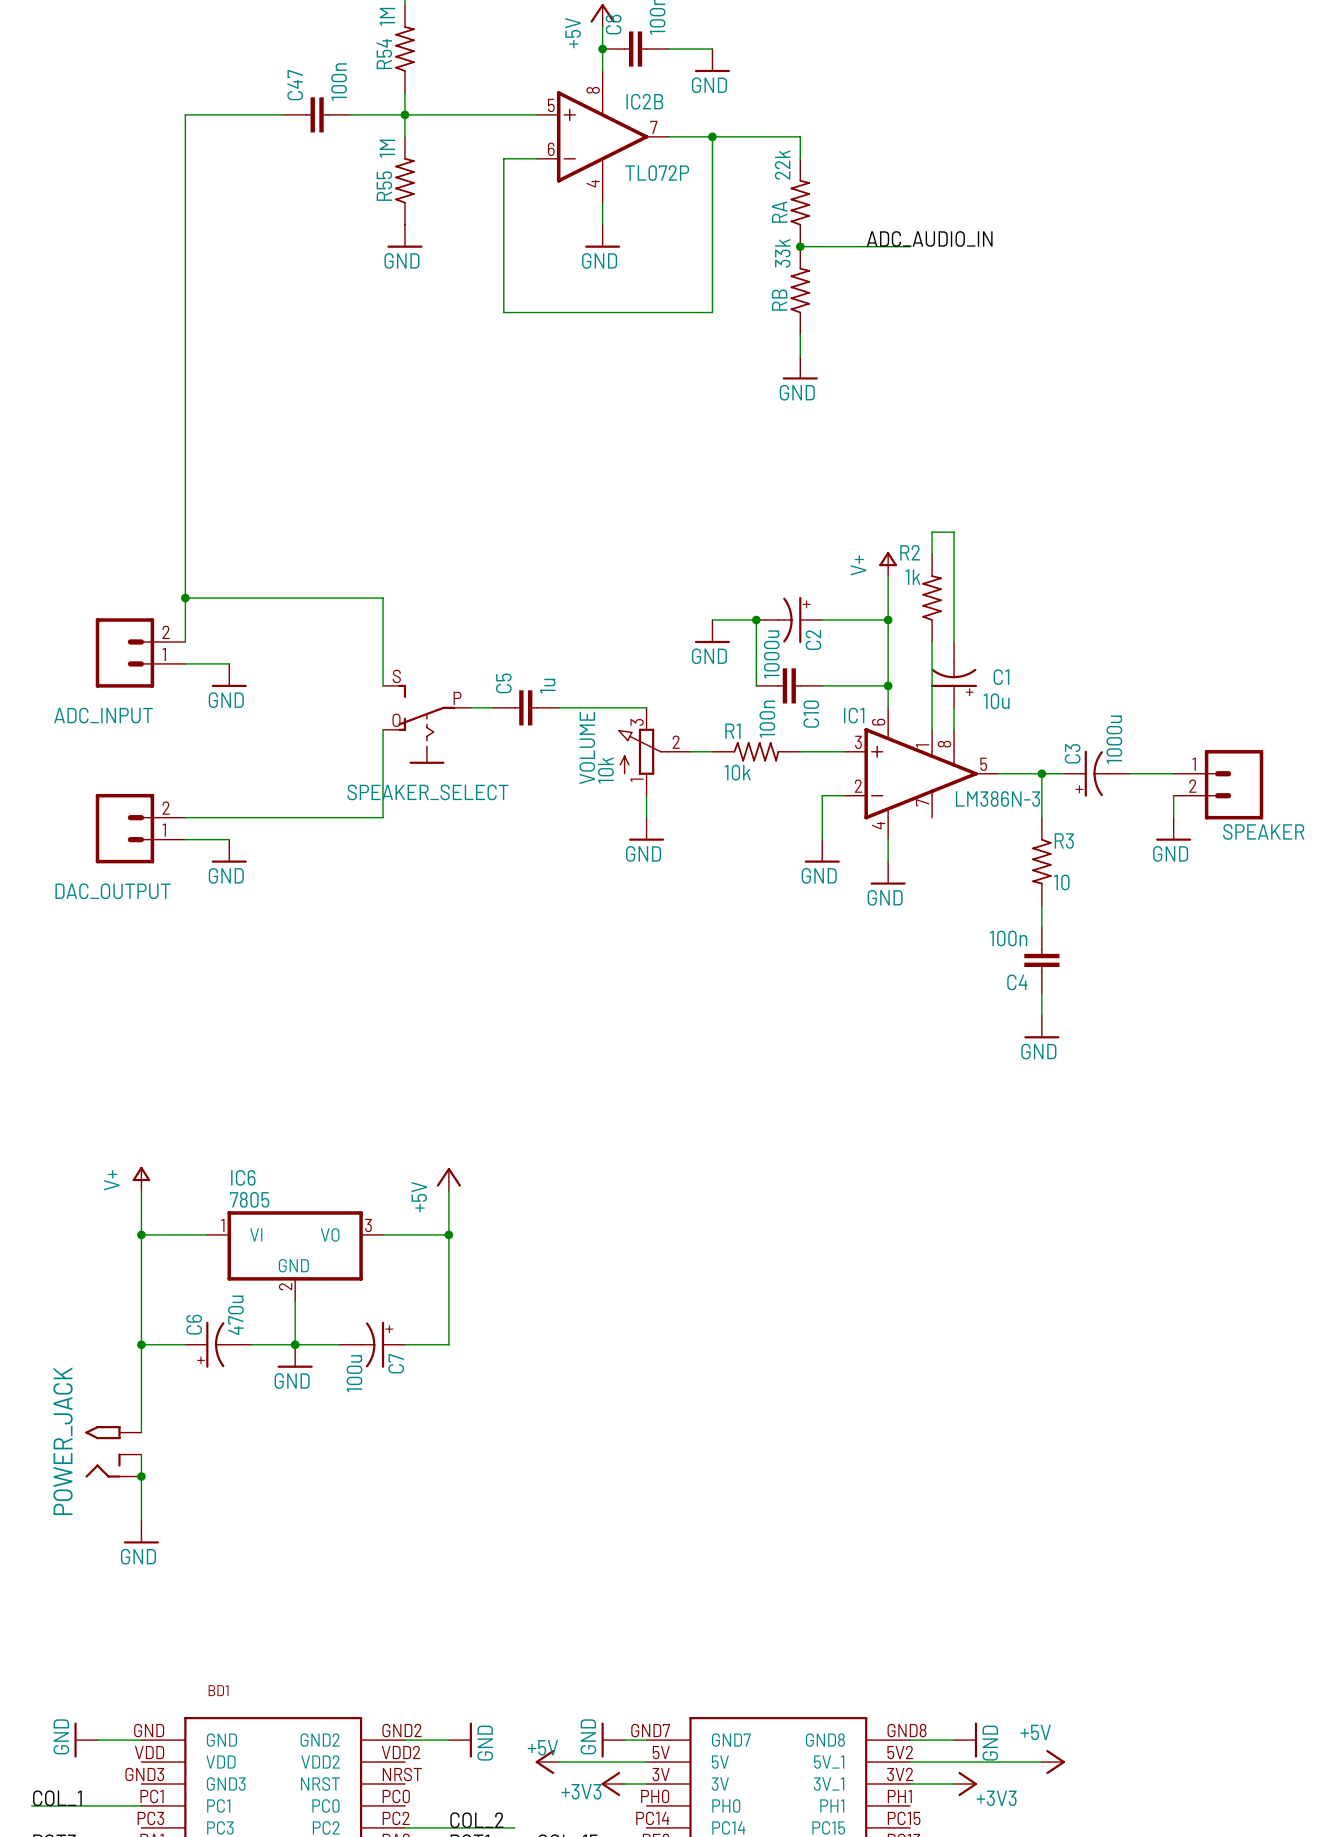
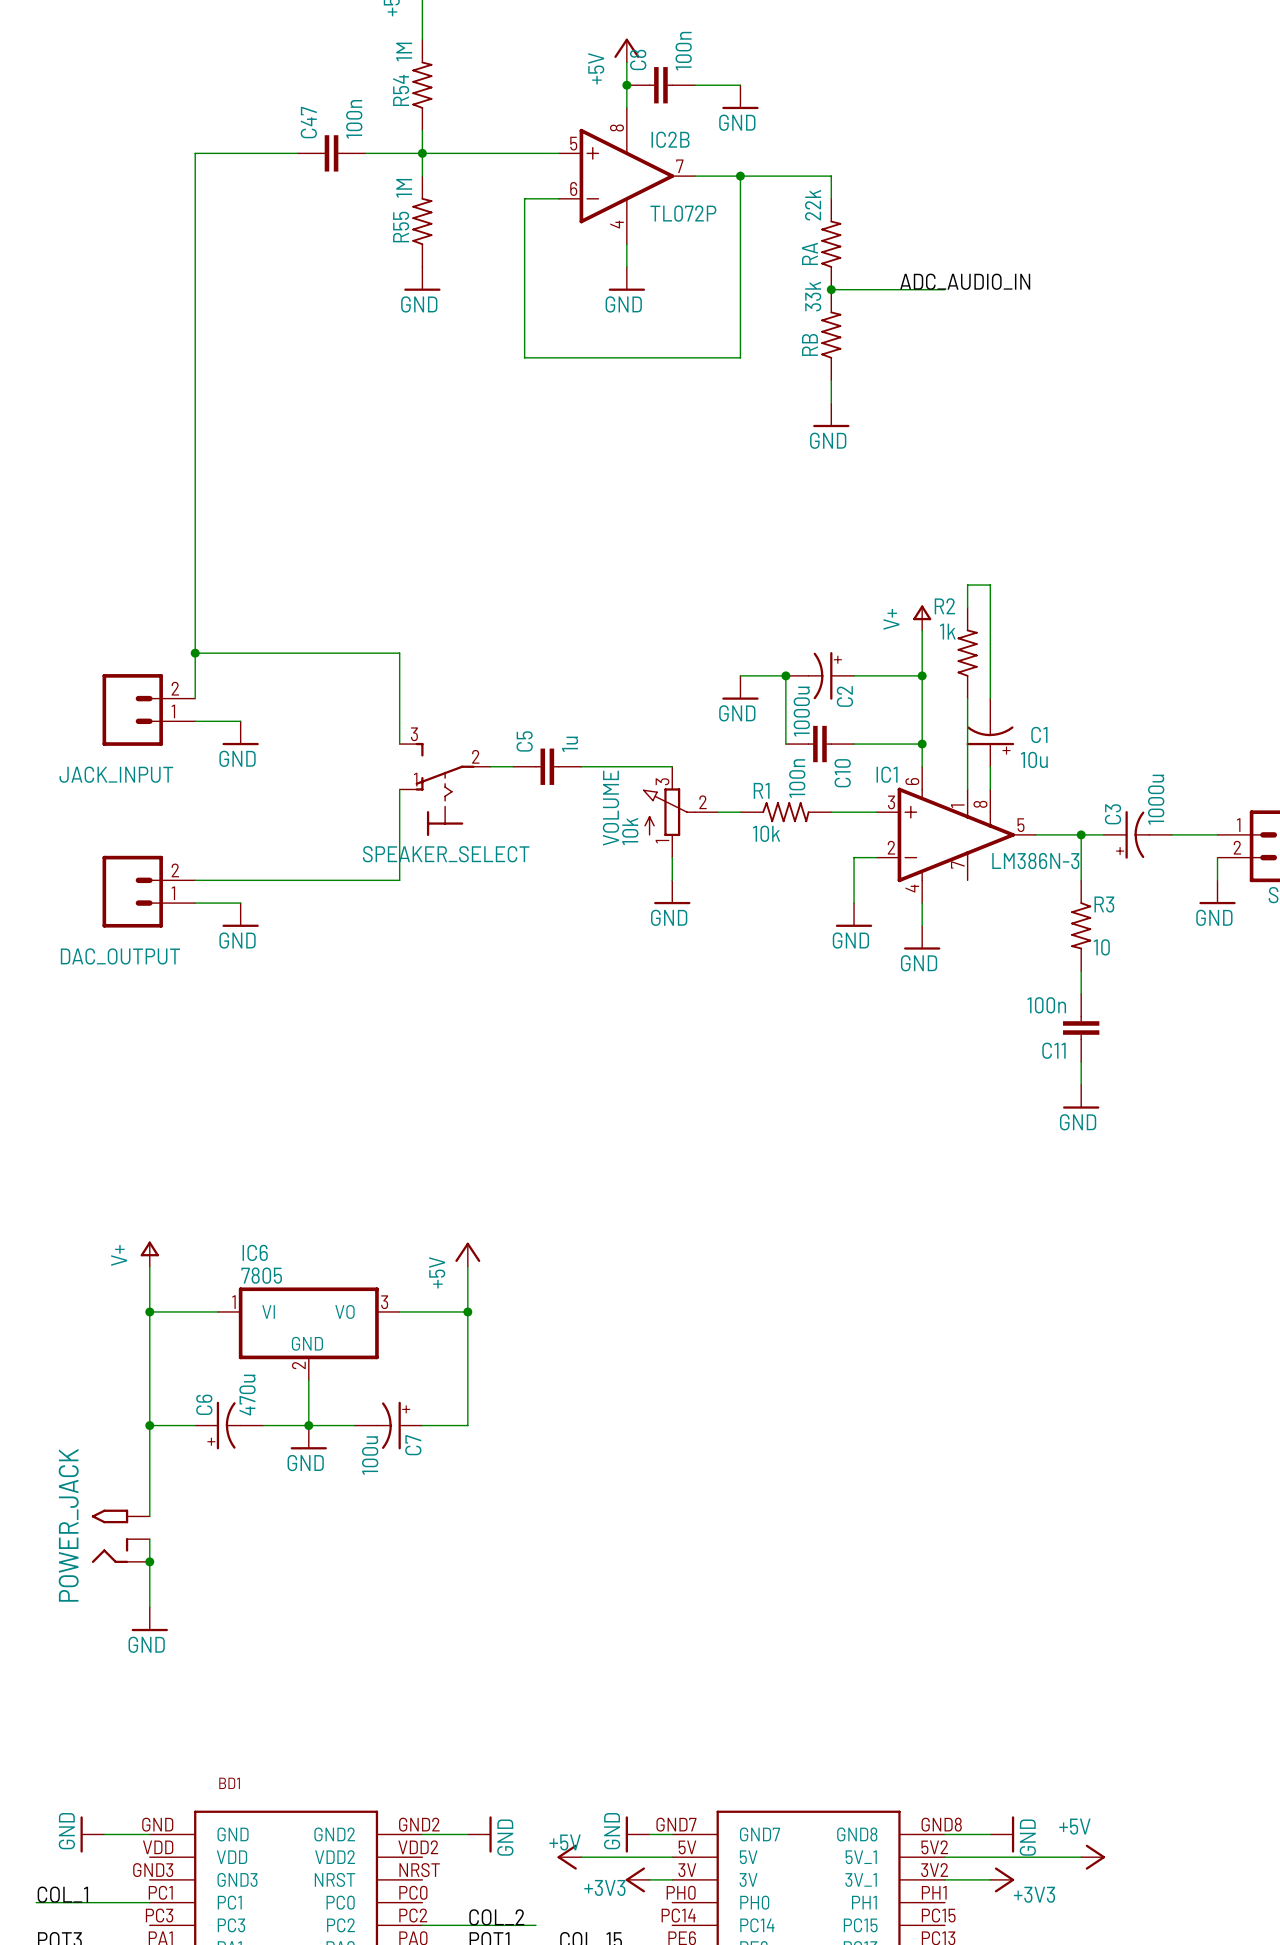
SPEAKER_SELECT symbol: [383, 684, 471, 764] -> [399, 742, 491, 837]
ADC_INPUT name: ADC_INPUT (103, 715) -> JACK_INPUT (116, 774)
C4 name: C4 (1017, 982) -> C11 (1053, 1050)

